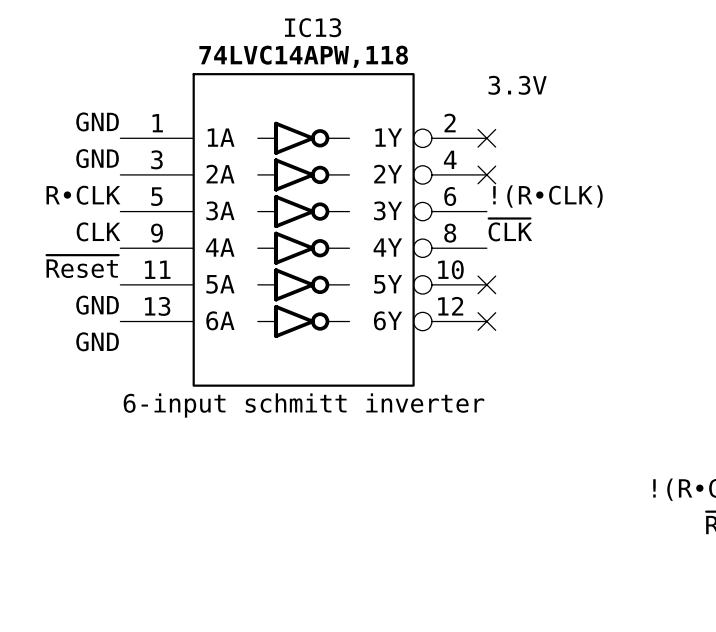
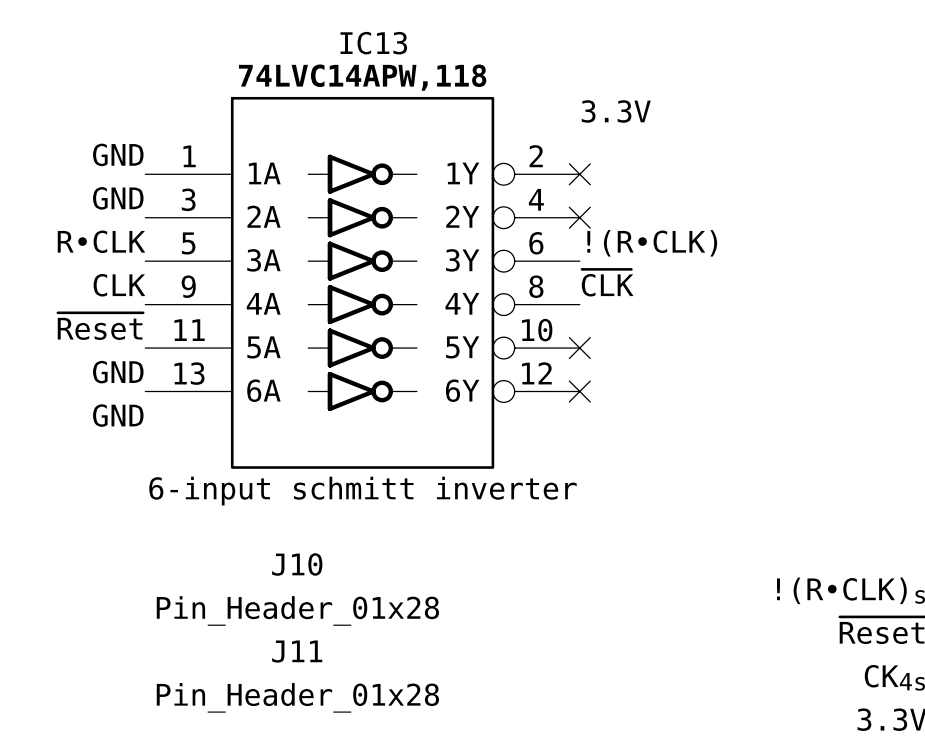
J10: none -> Pin_Header_01x28 (297, 589)
J11: none -> Pin_Header_01x28 (297, 676)

